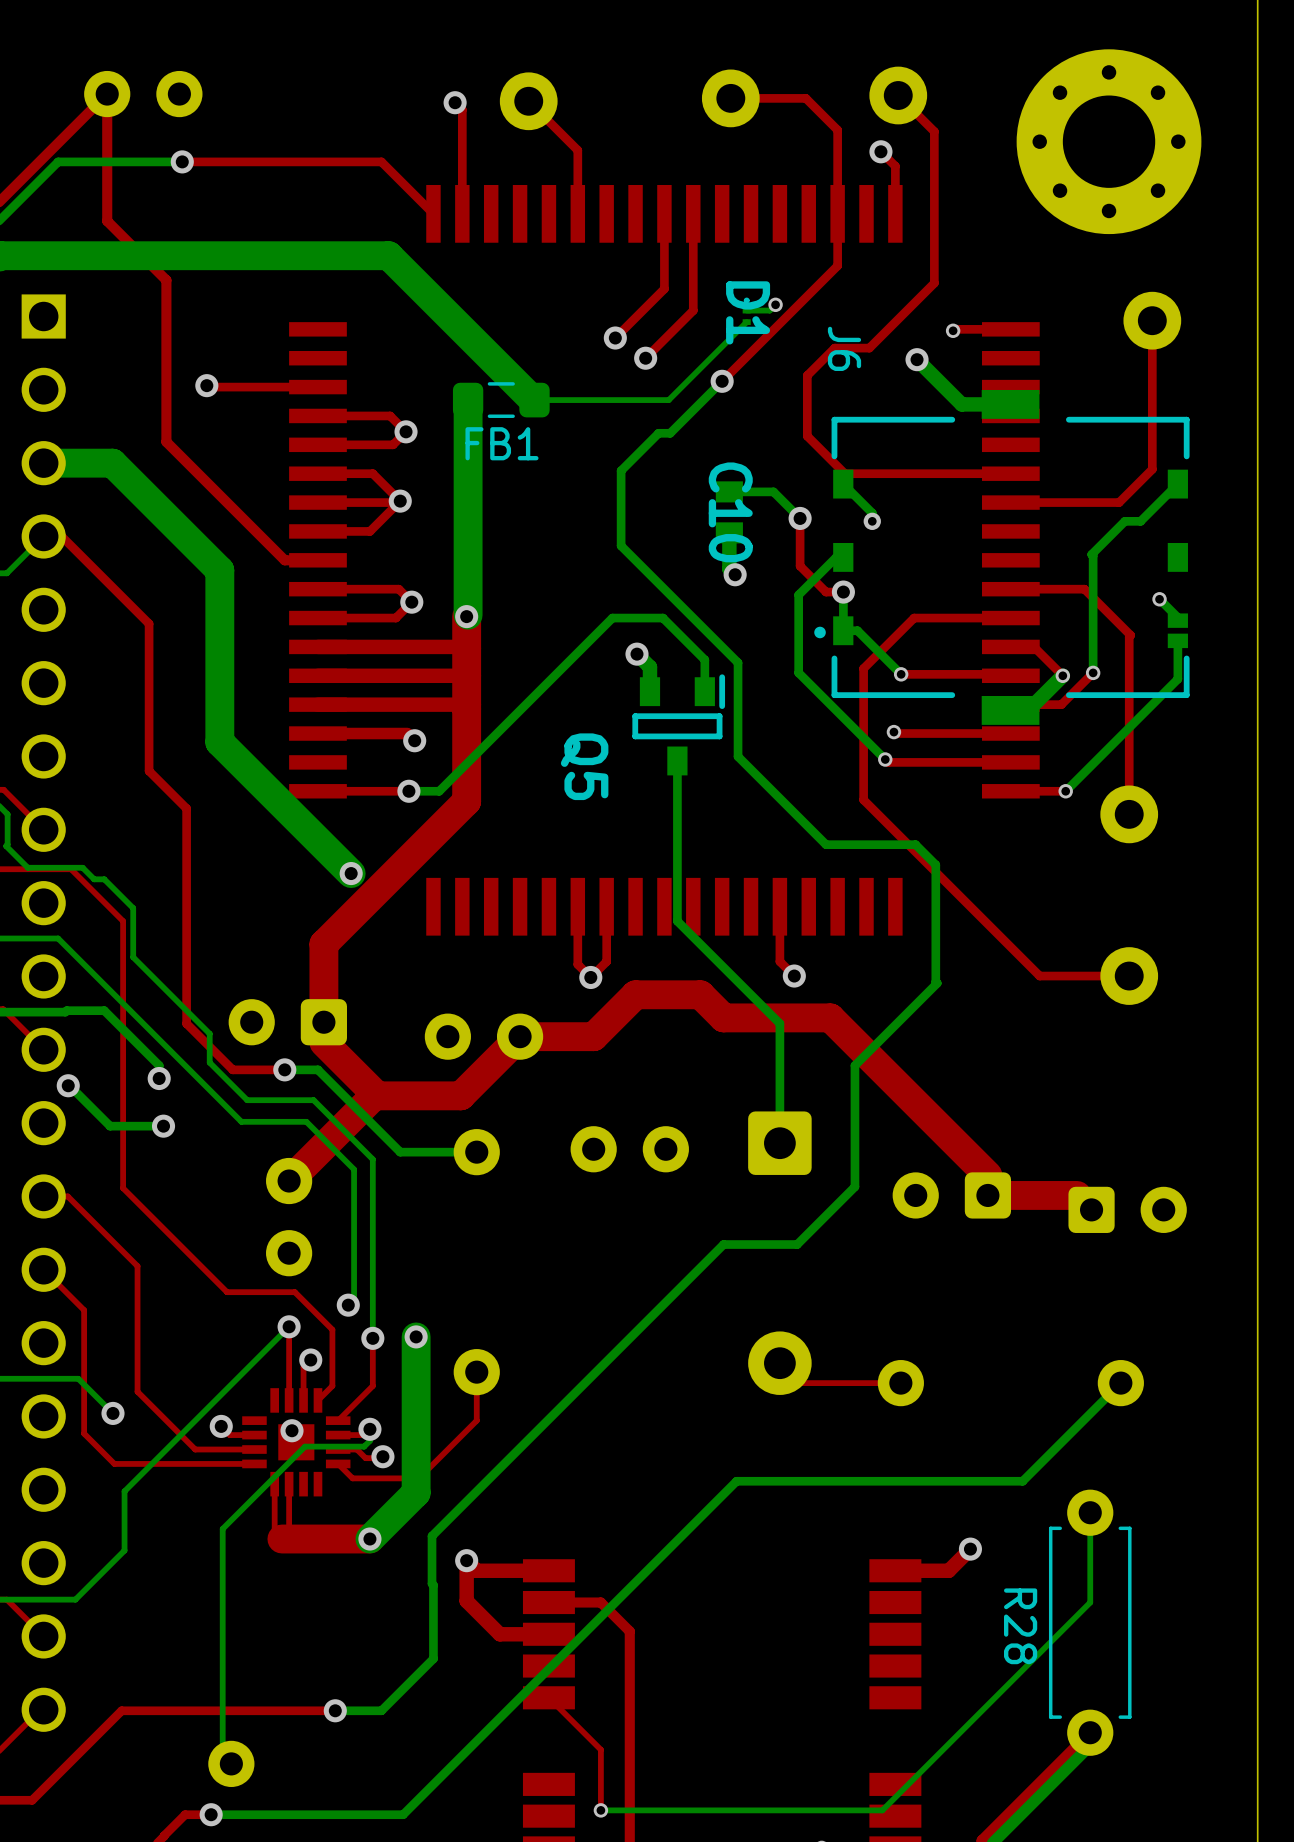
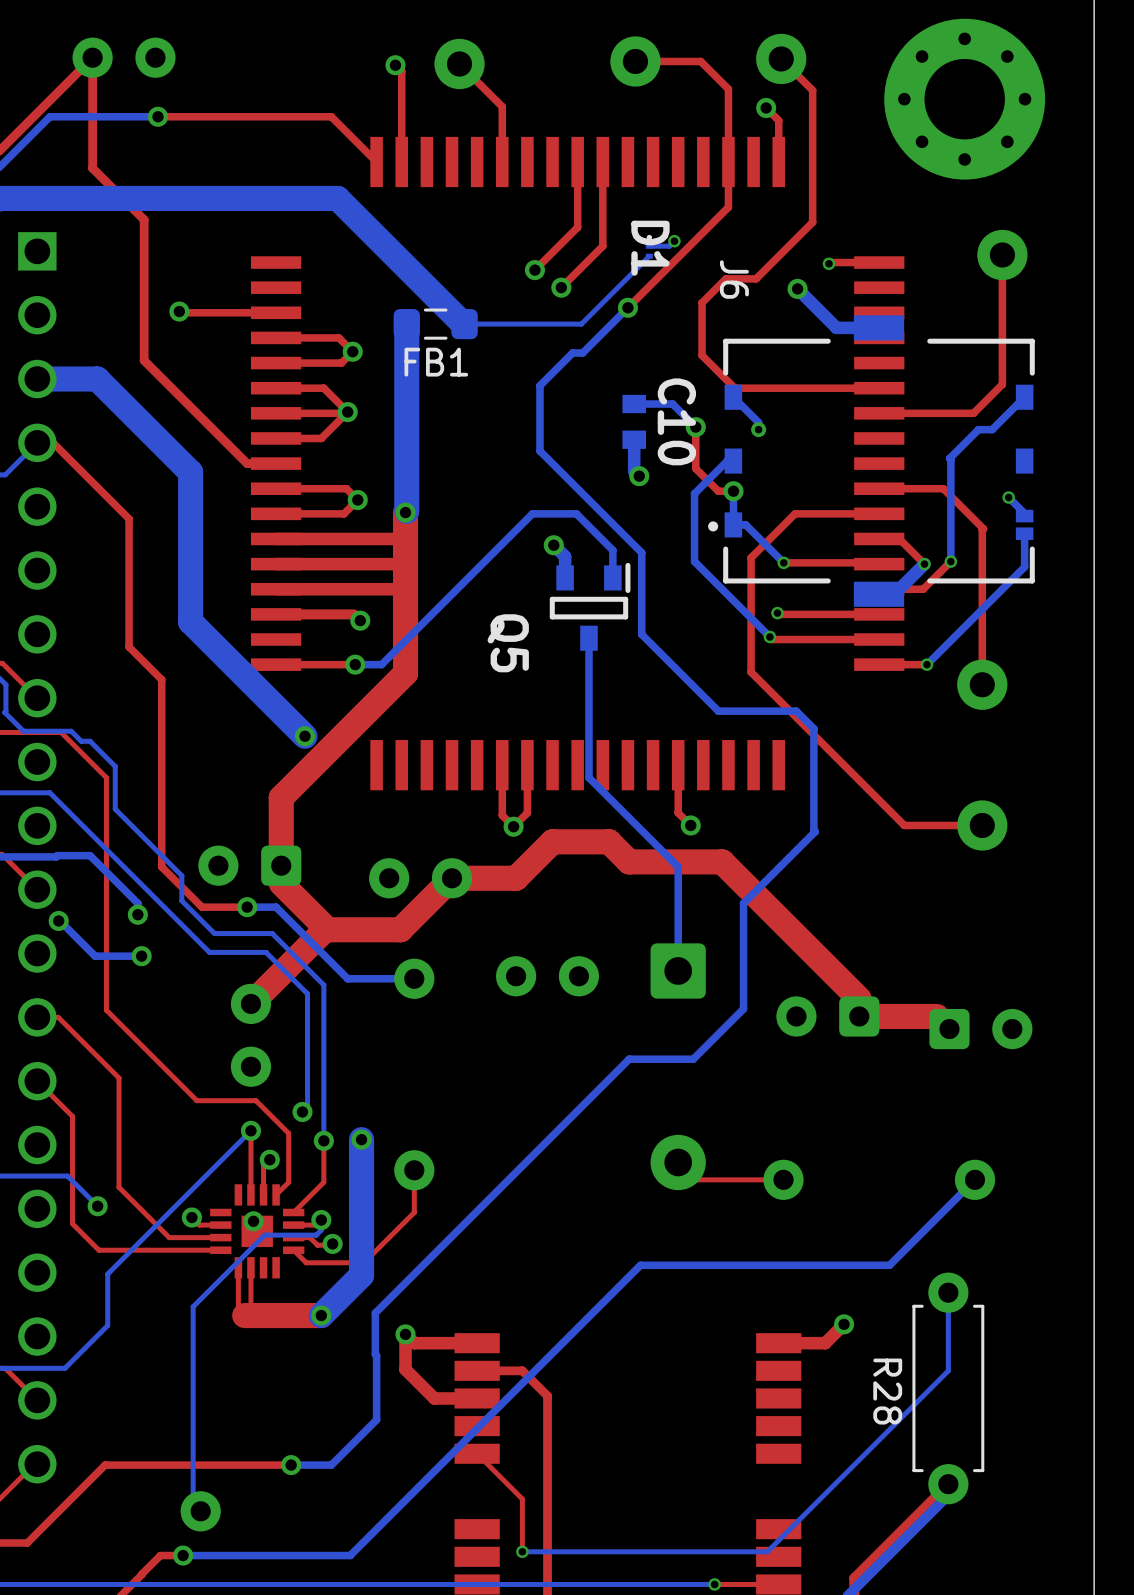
C10 name position: C10 (730, 512) -> C10 (676, 421)

